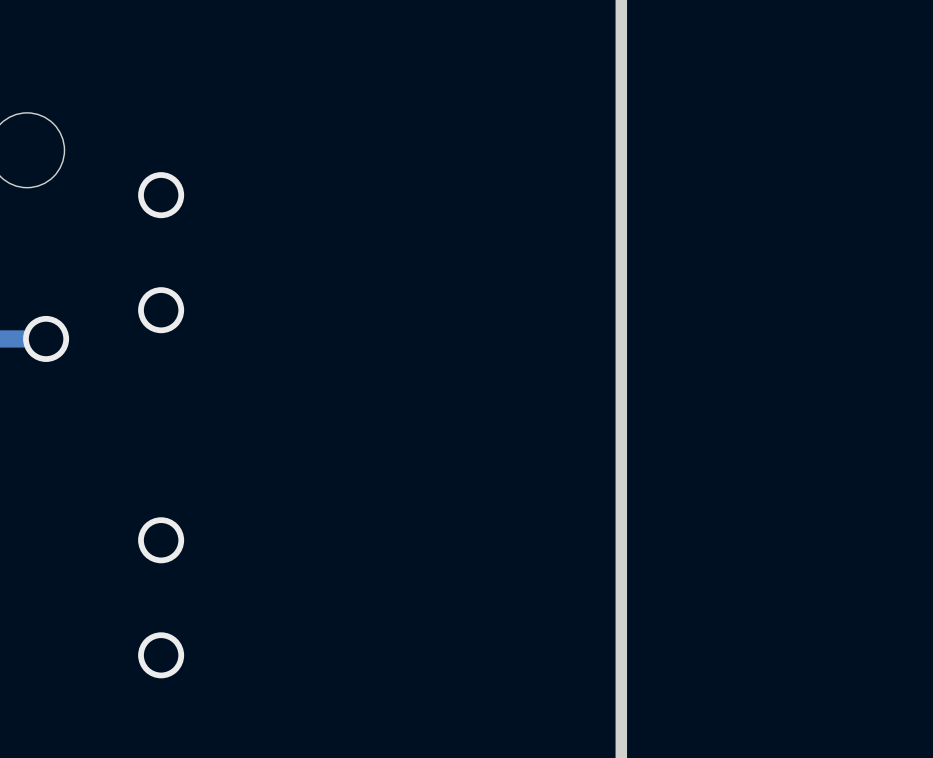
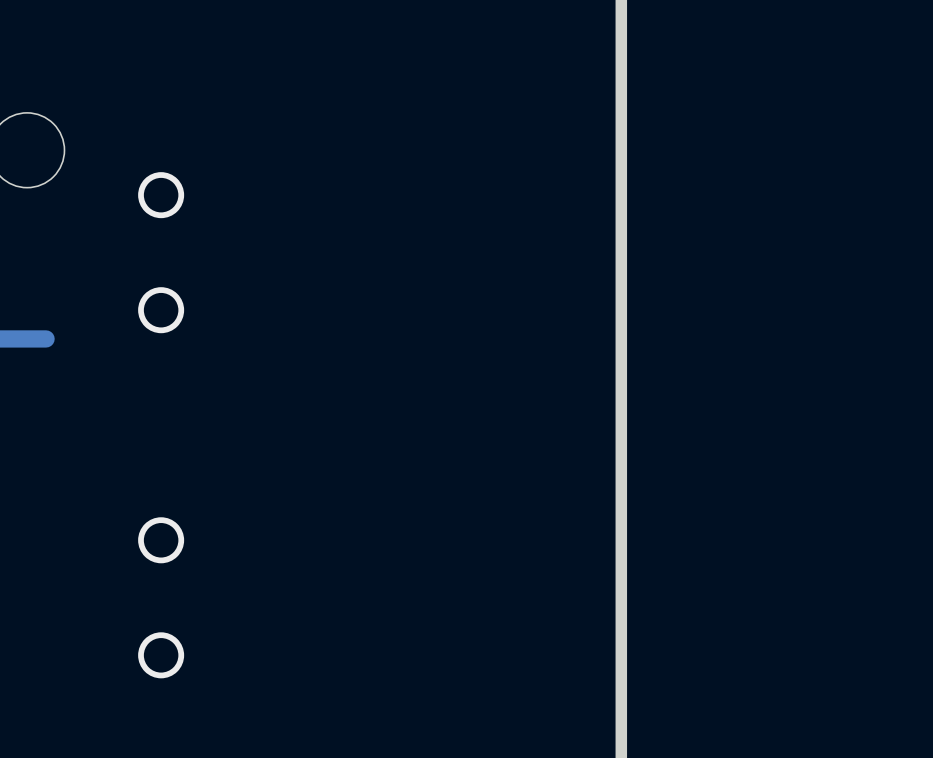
via: (46, 338) -> none

